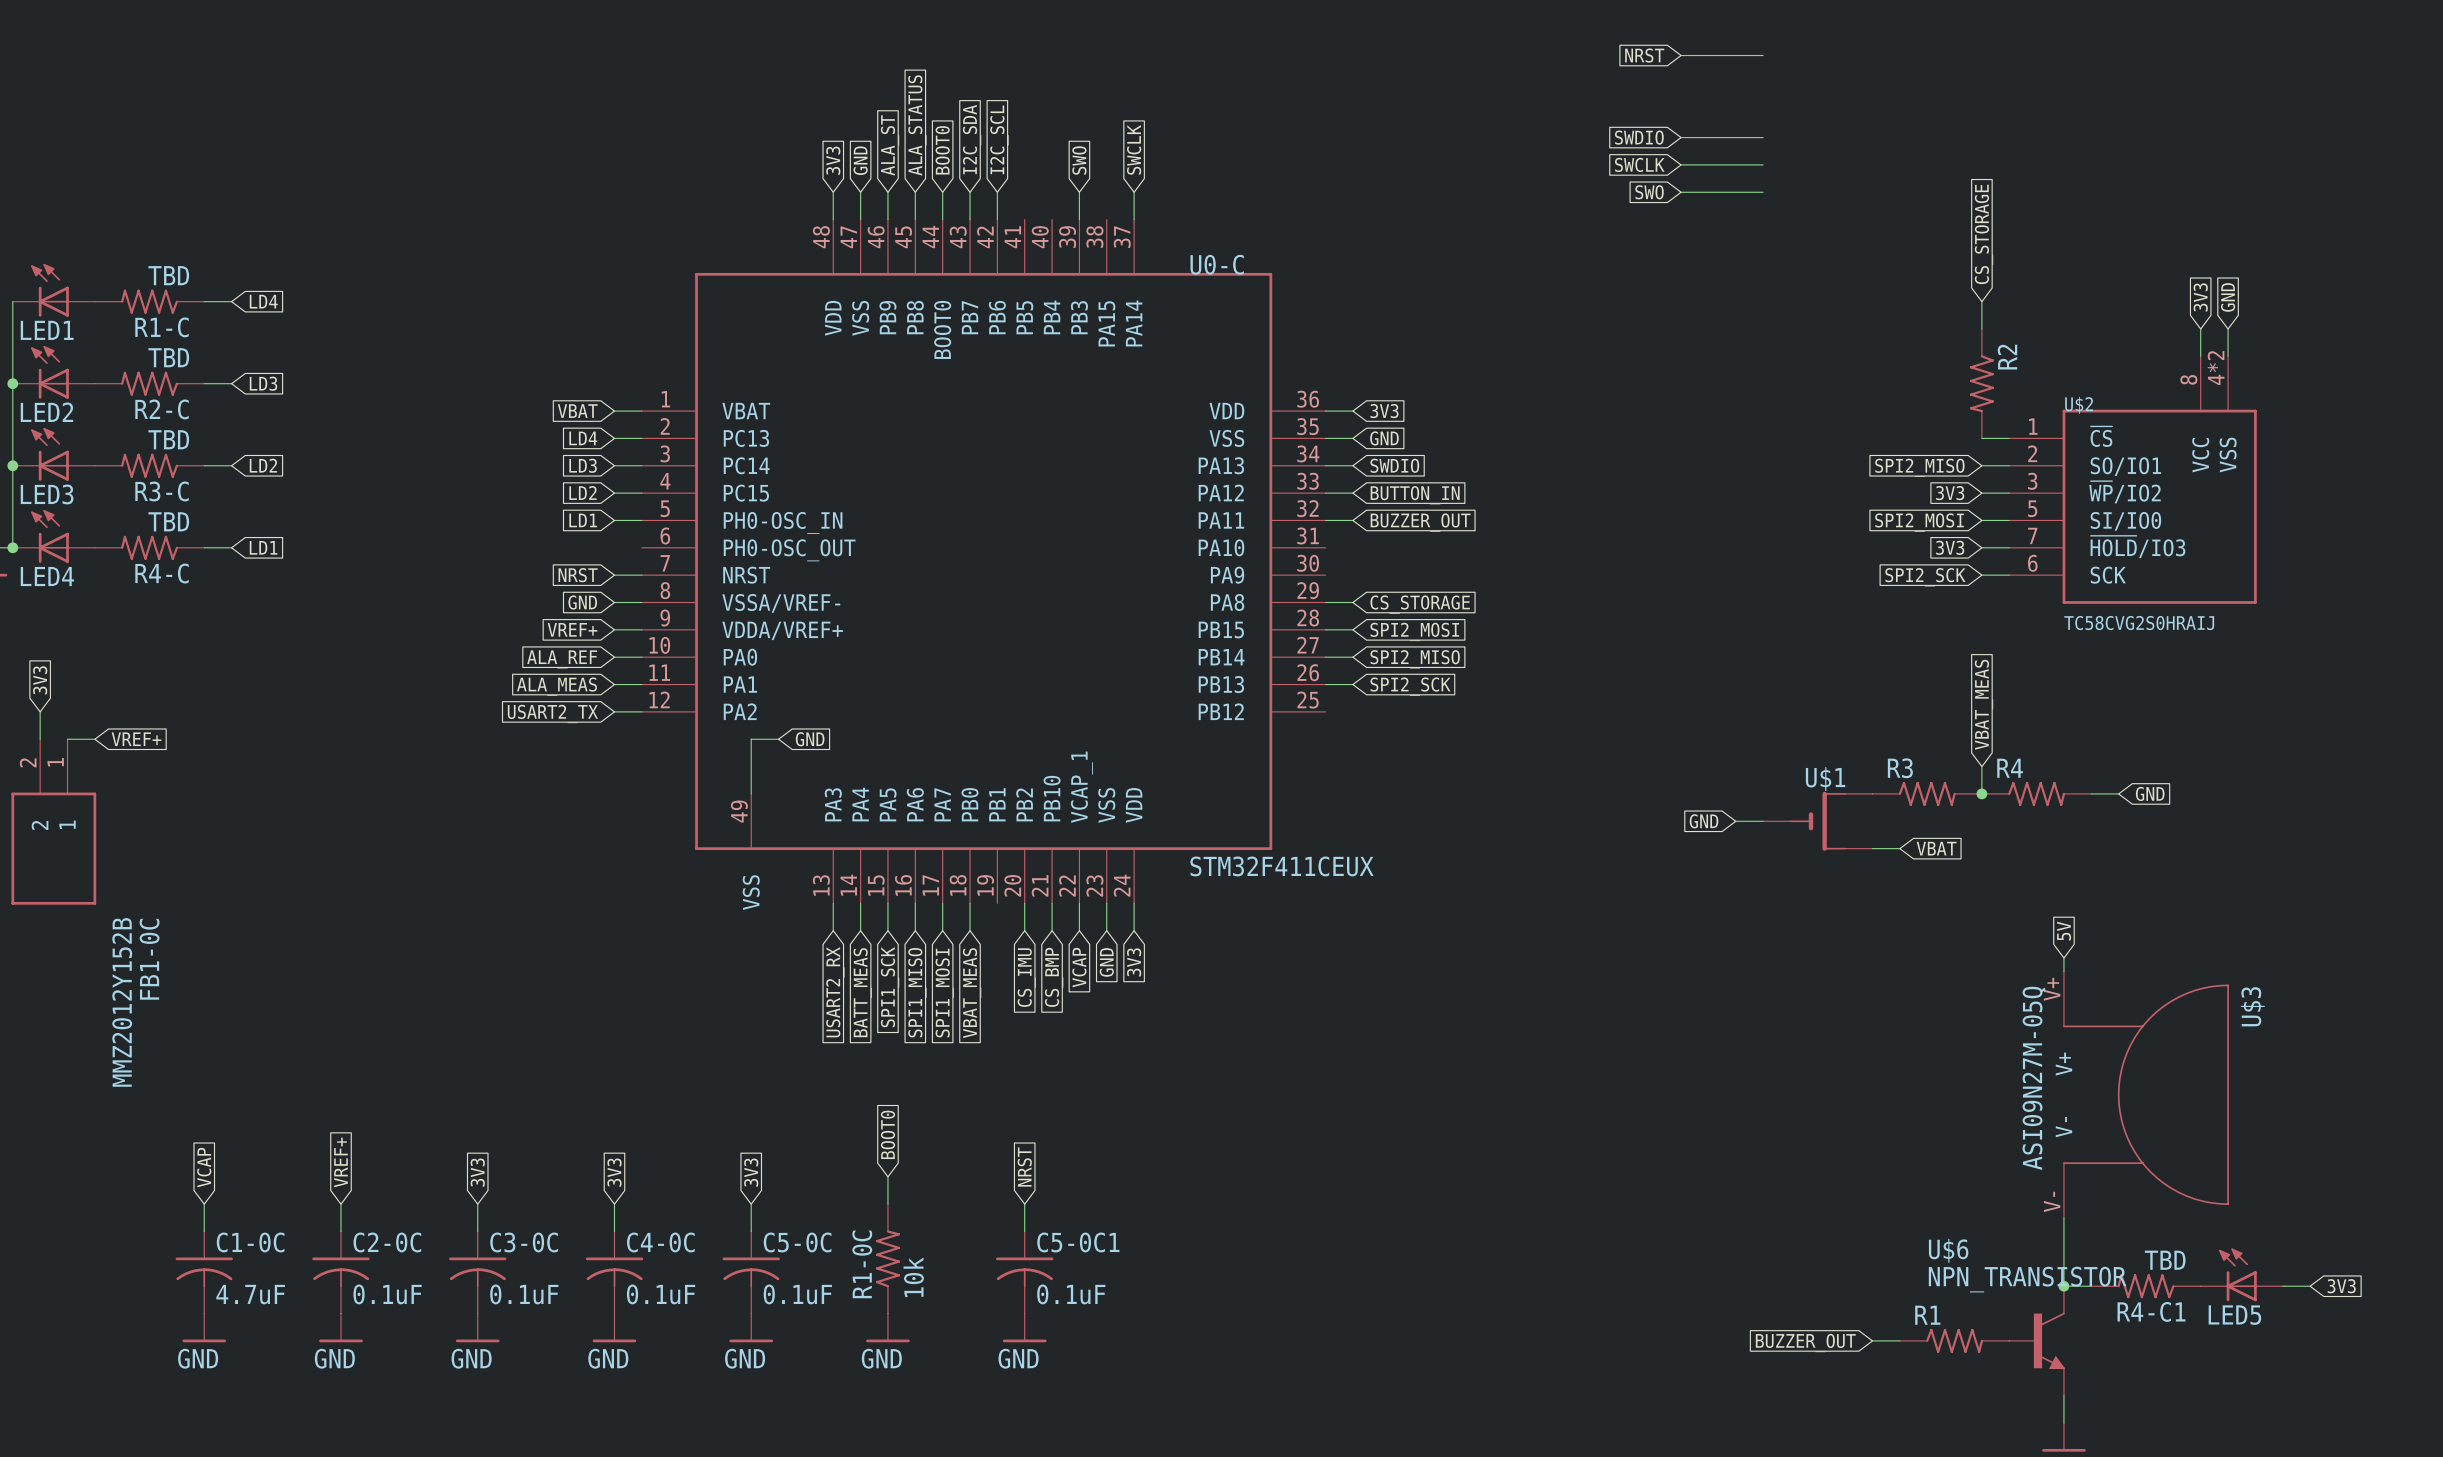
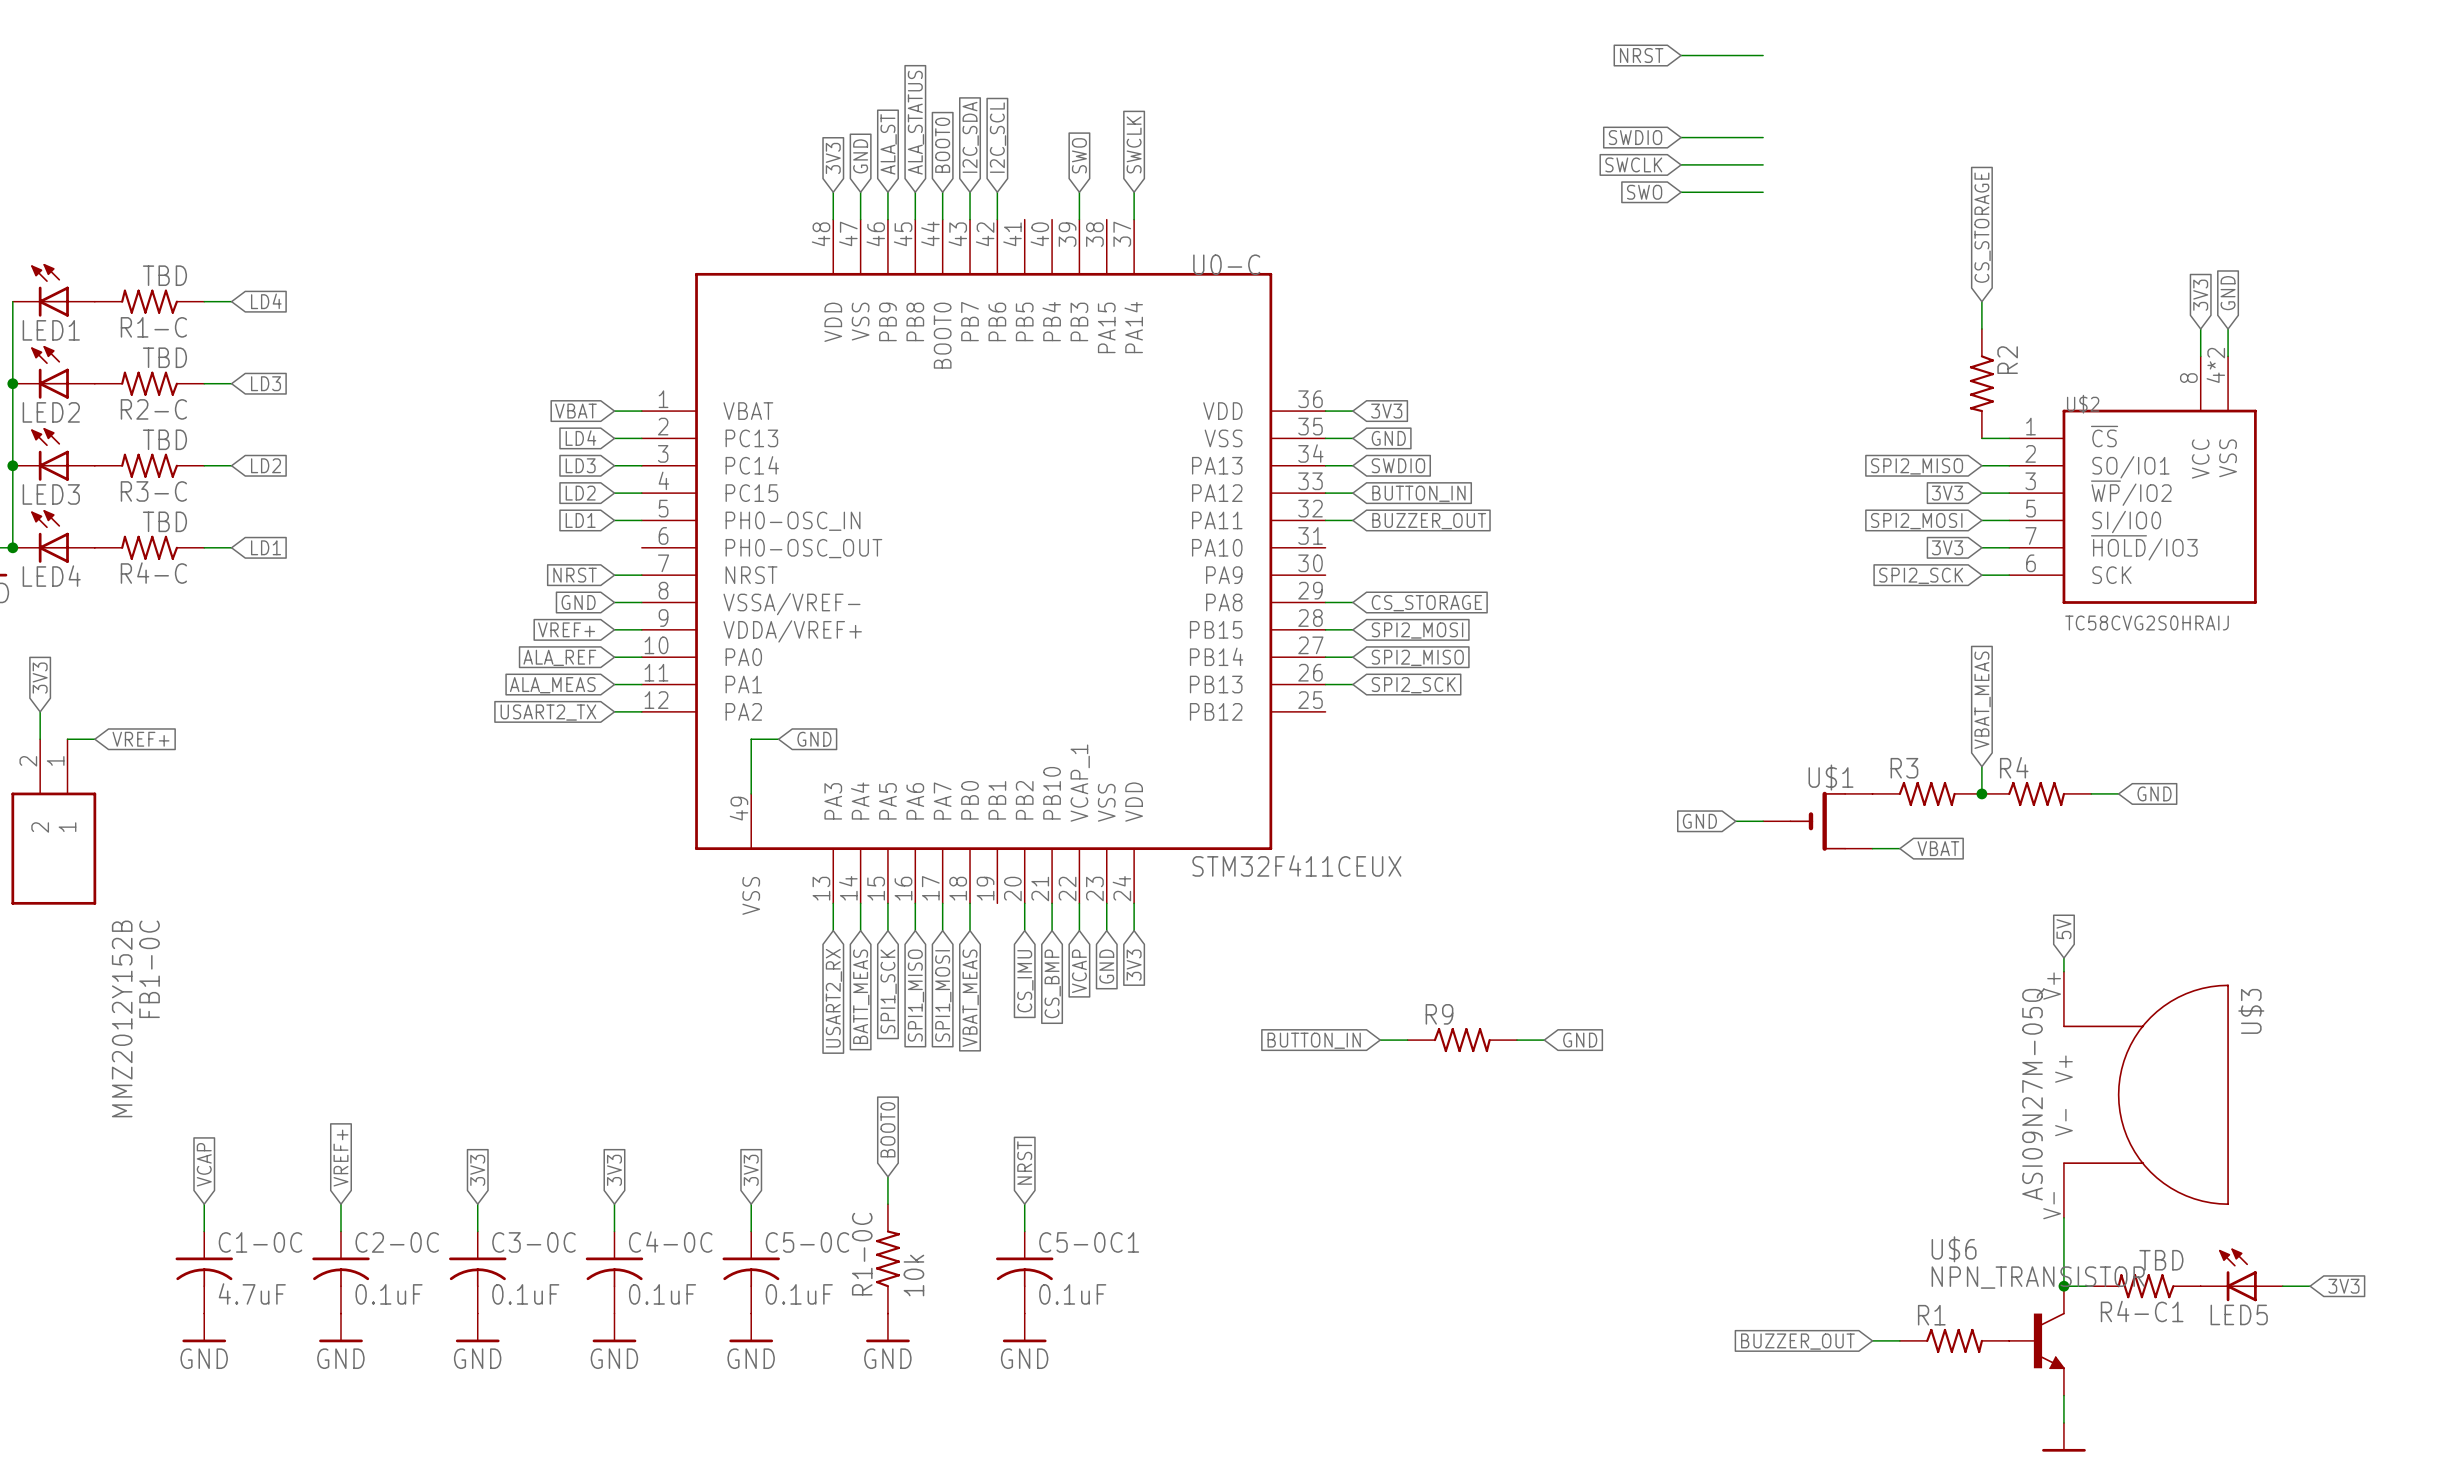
wire: none -> (1380, 1040) (1407, 1040)
R9: none -> (1462, 1040)
wire: none -> (1516, 1040) (1544, 1040)
global label: none -> GND (1580, 1040)
global label: none -> BUTTON_IN (1314, 1040)

